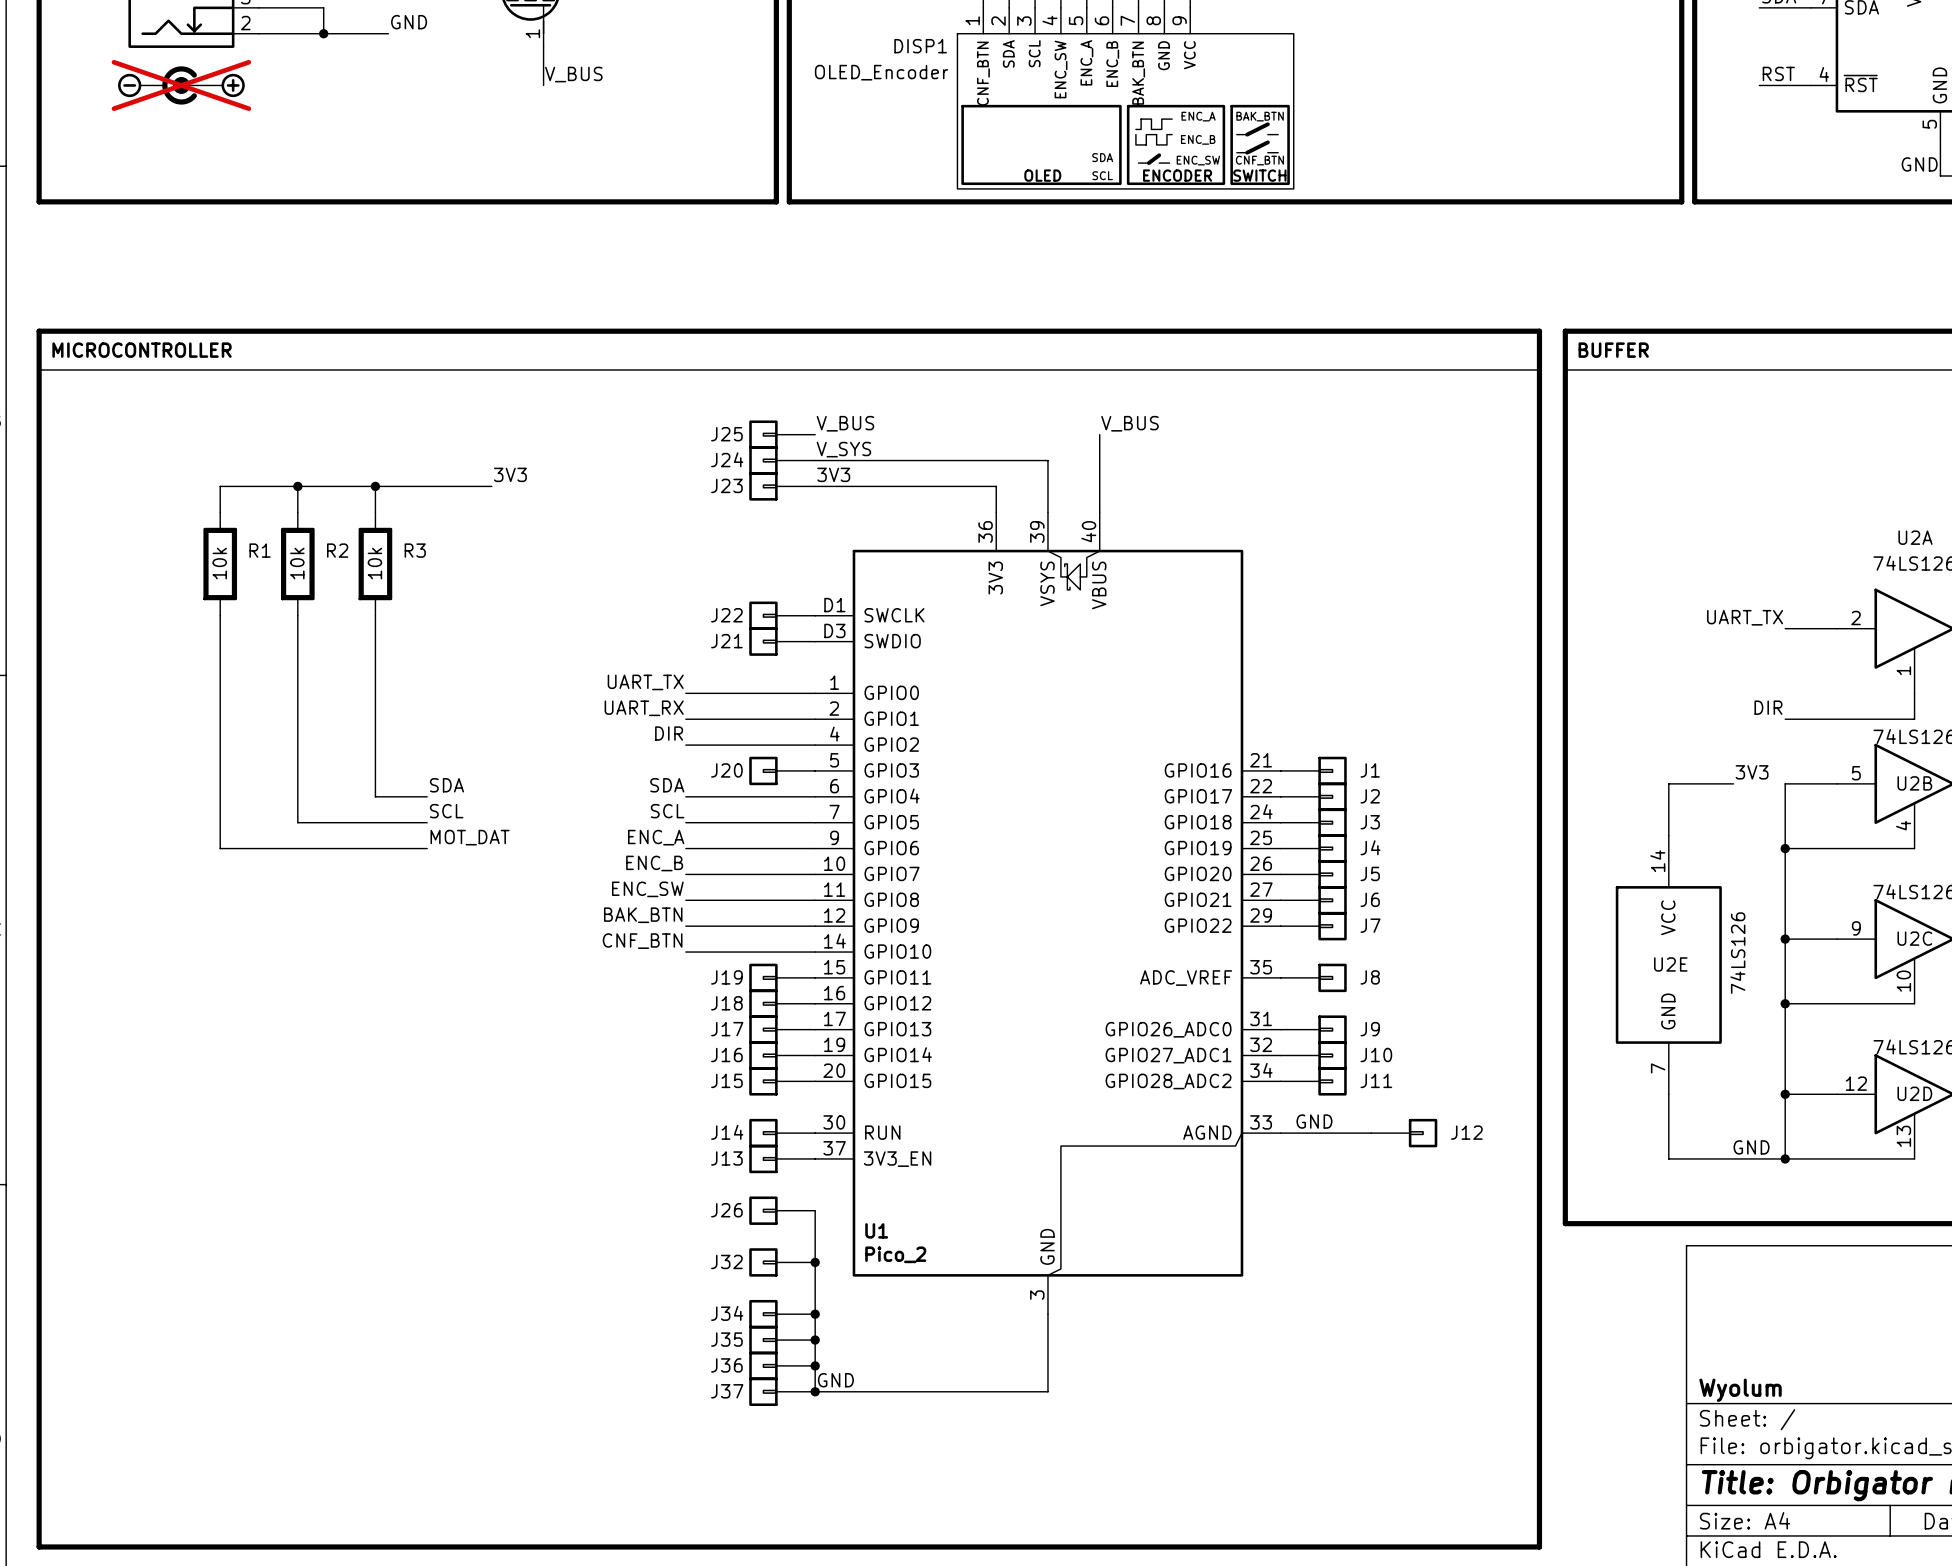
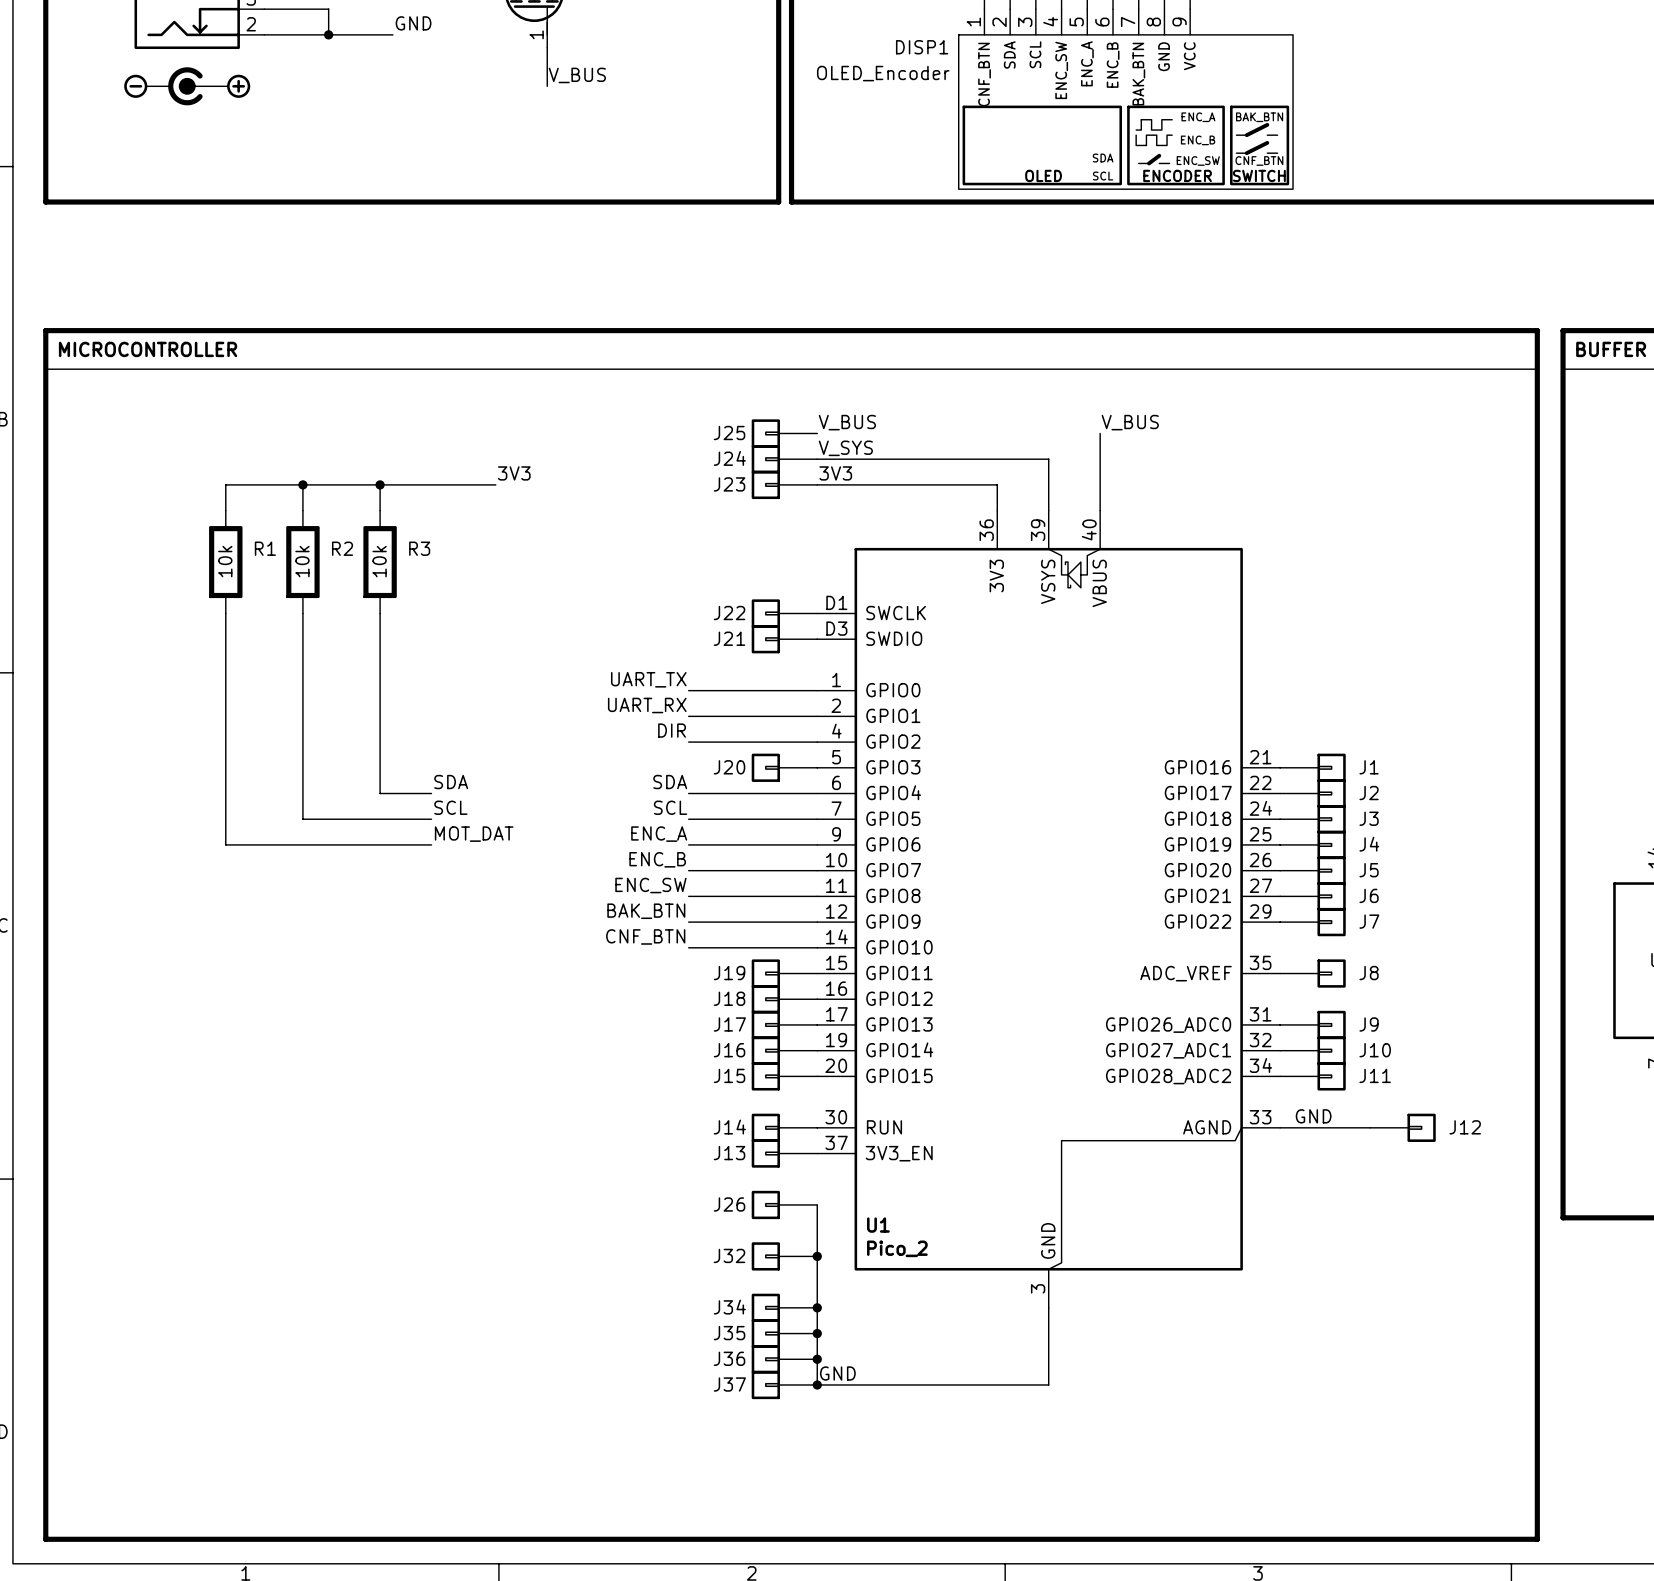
part do-not-place cross: (181, 85) -> none

